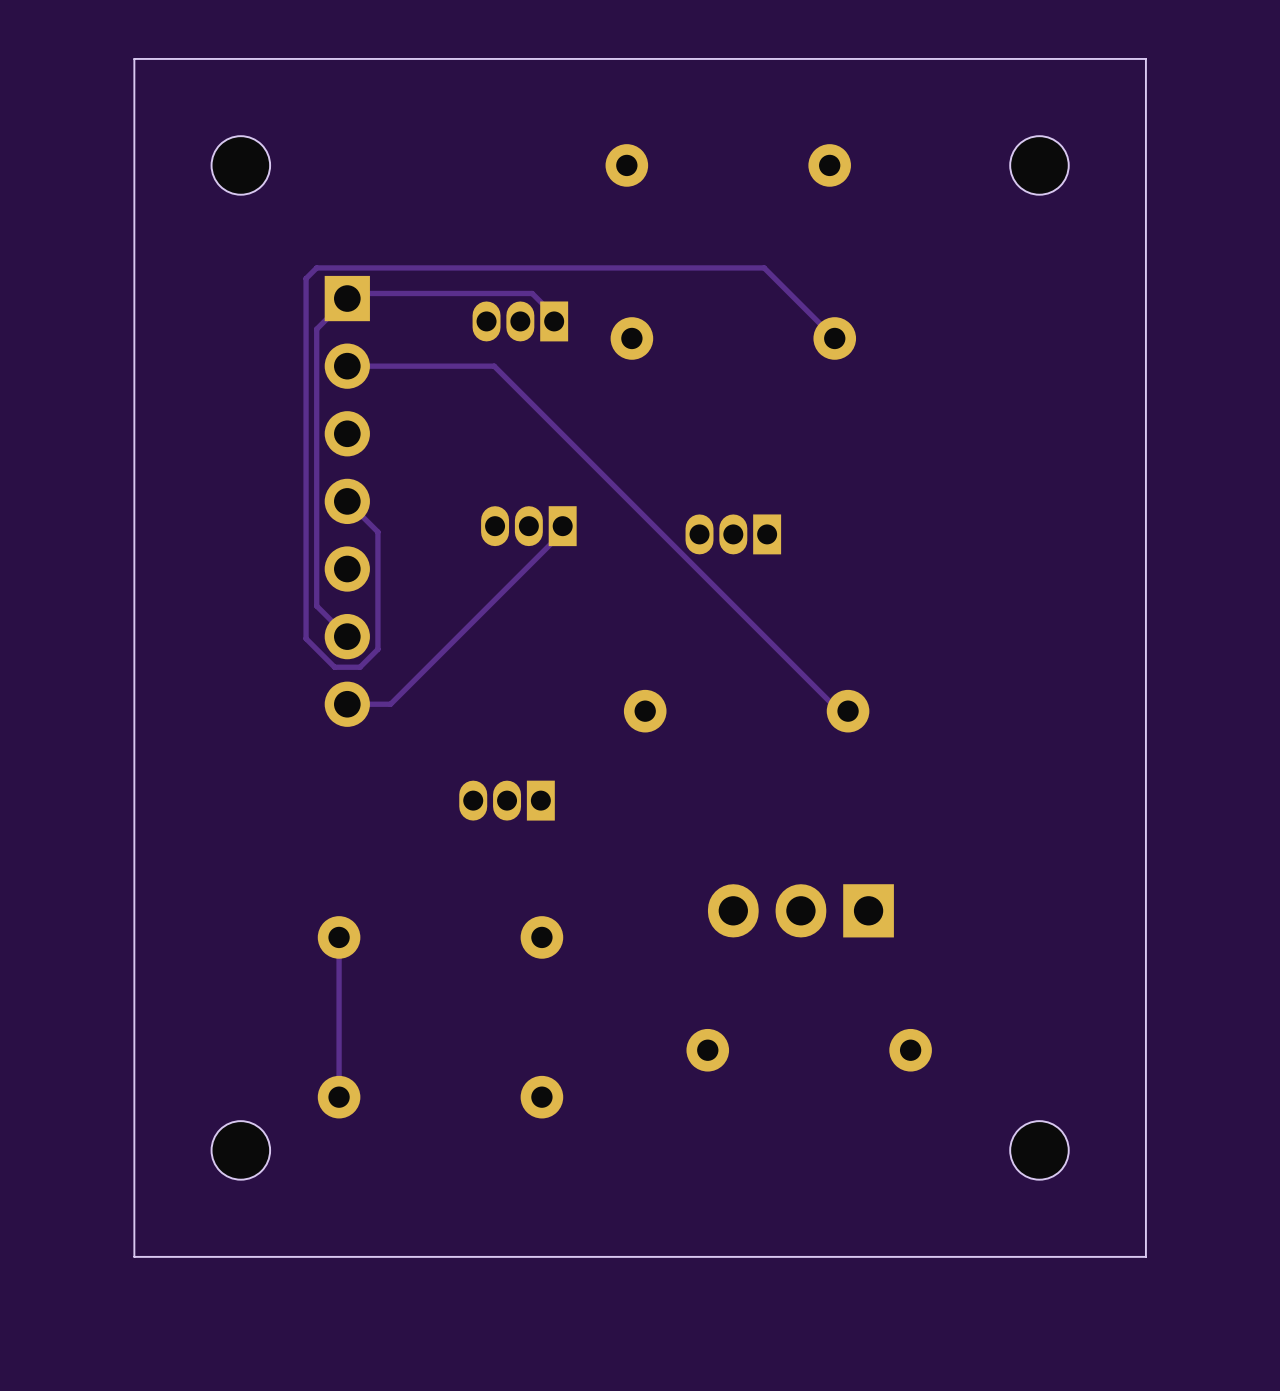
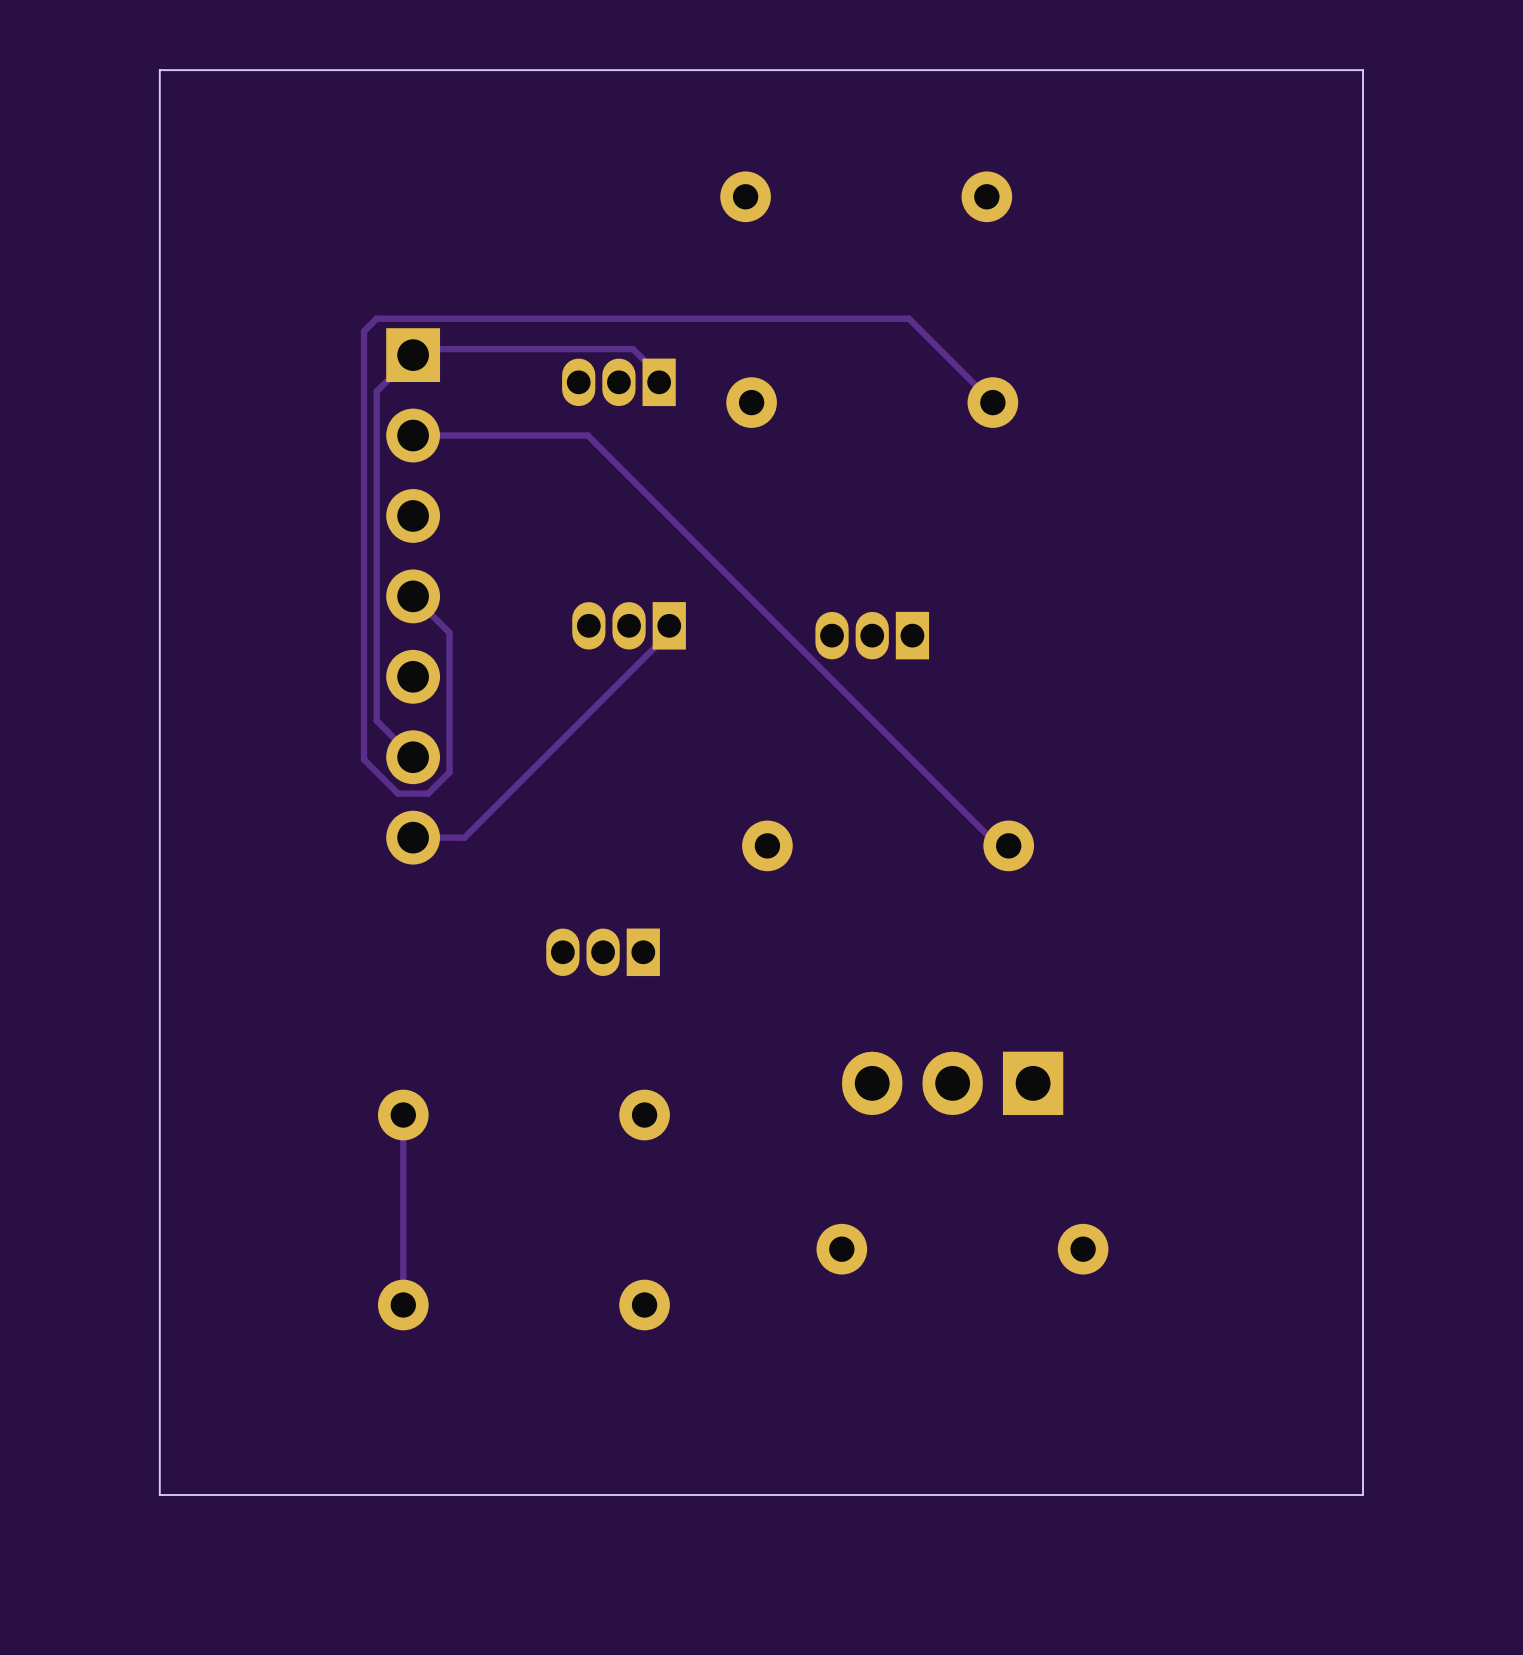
part: (240, 165) -> none
part: (1039, 165) -> none
part: (240, 1150) -> none
part: (1039, 1150) -> none

